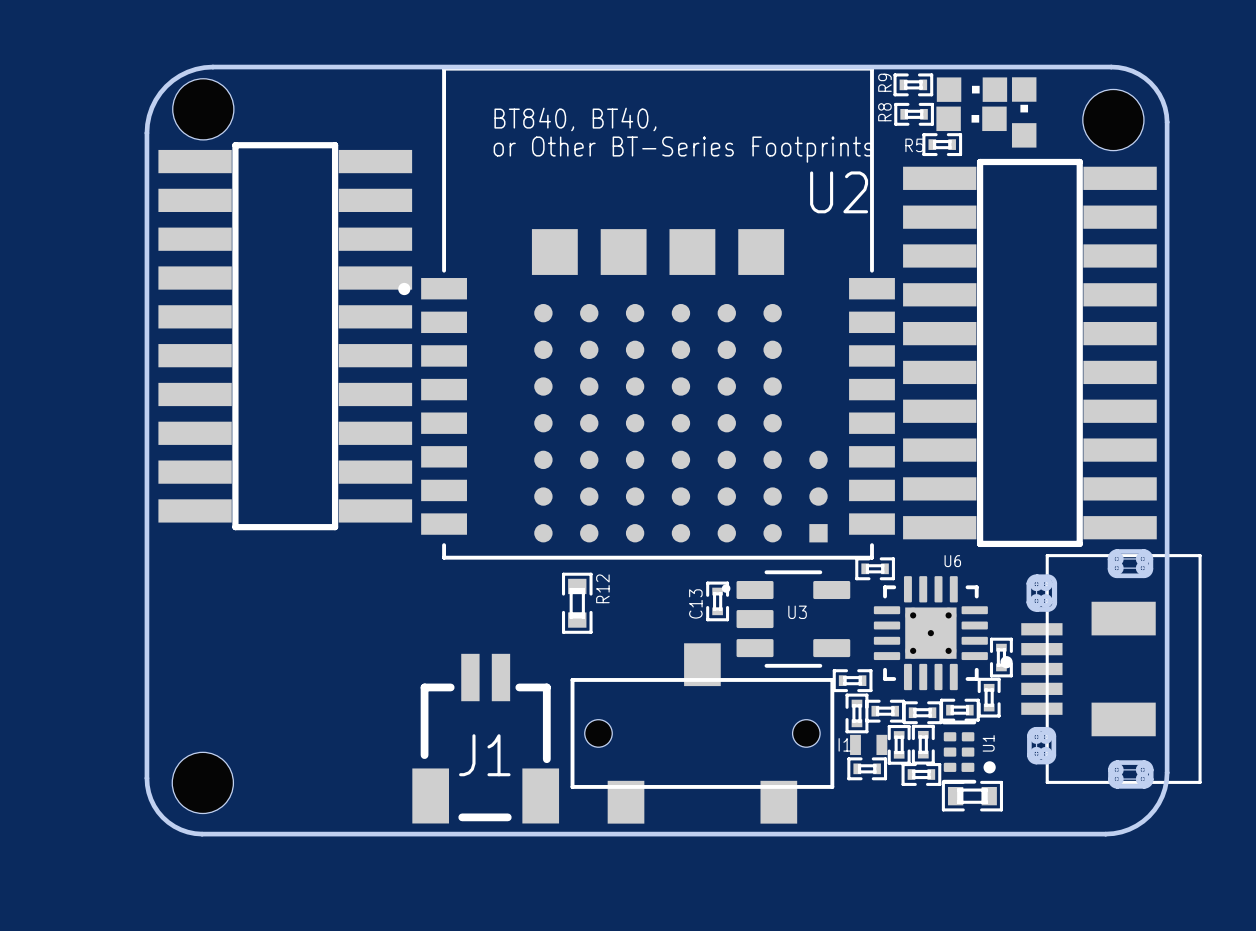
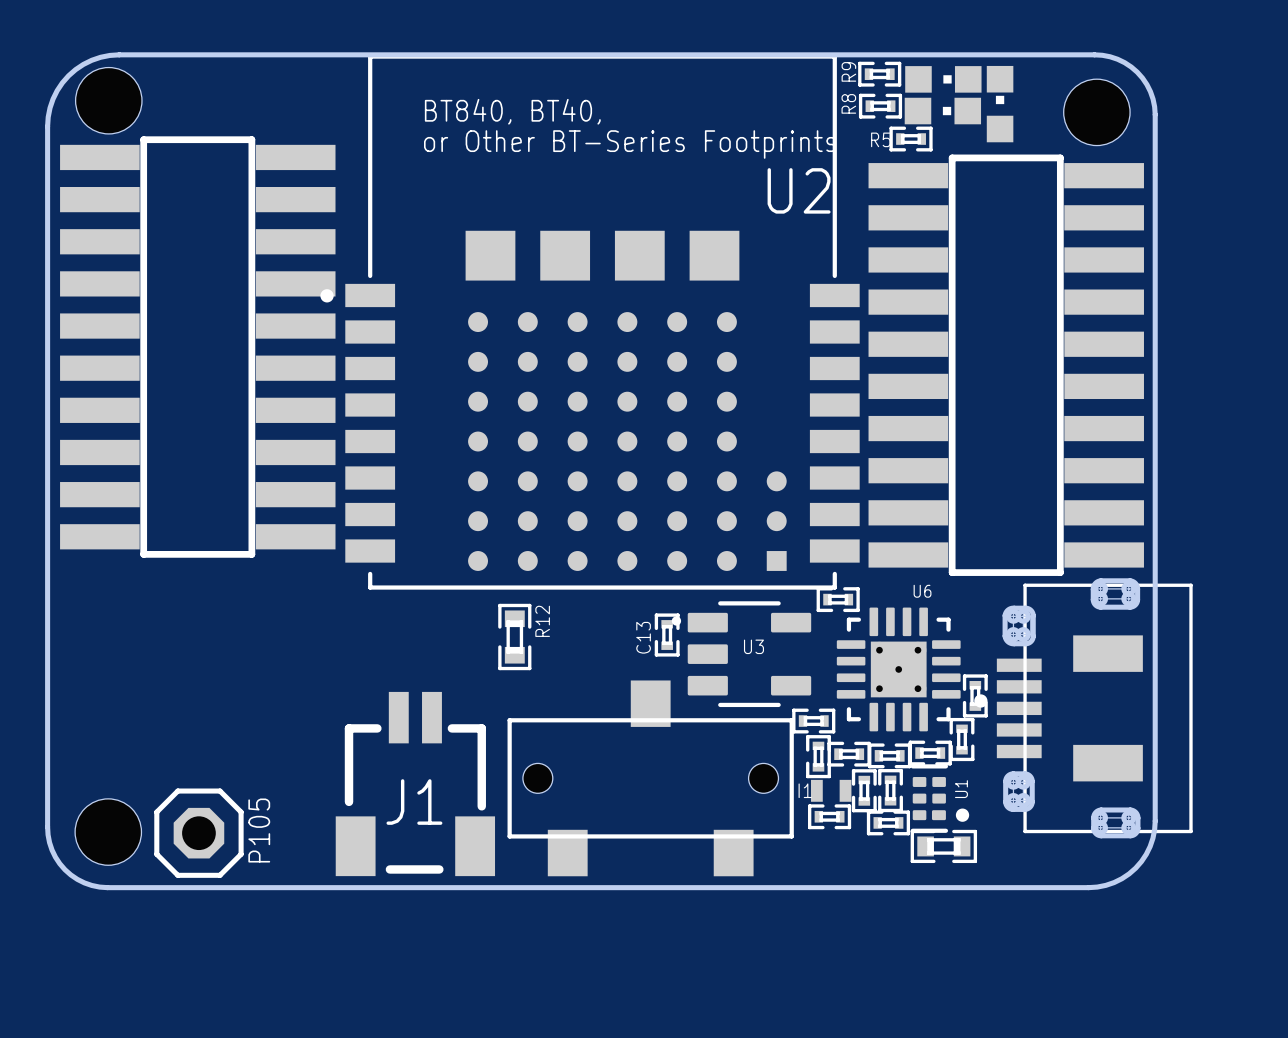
text: none -> P105 (259, 830)
part: none -> (198, 833)

